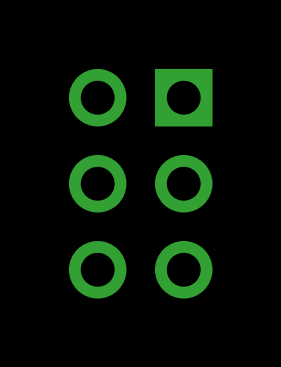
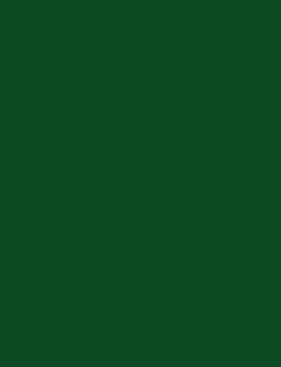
part: (140, 183) -> none

